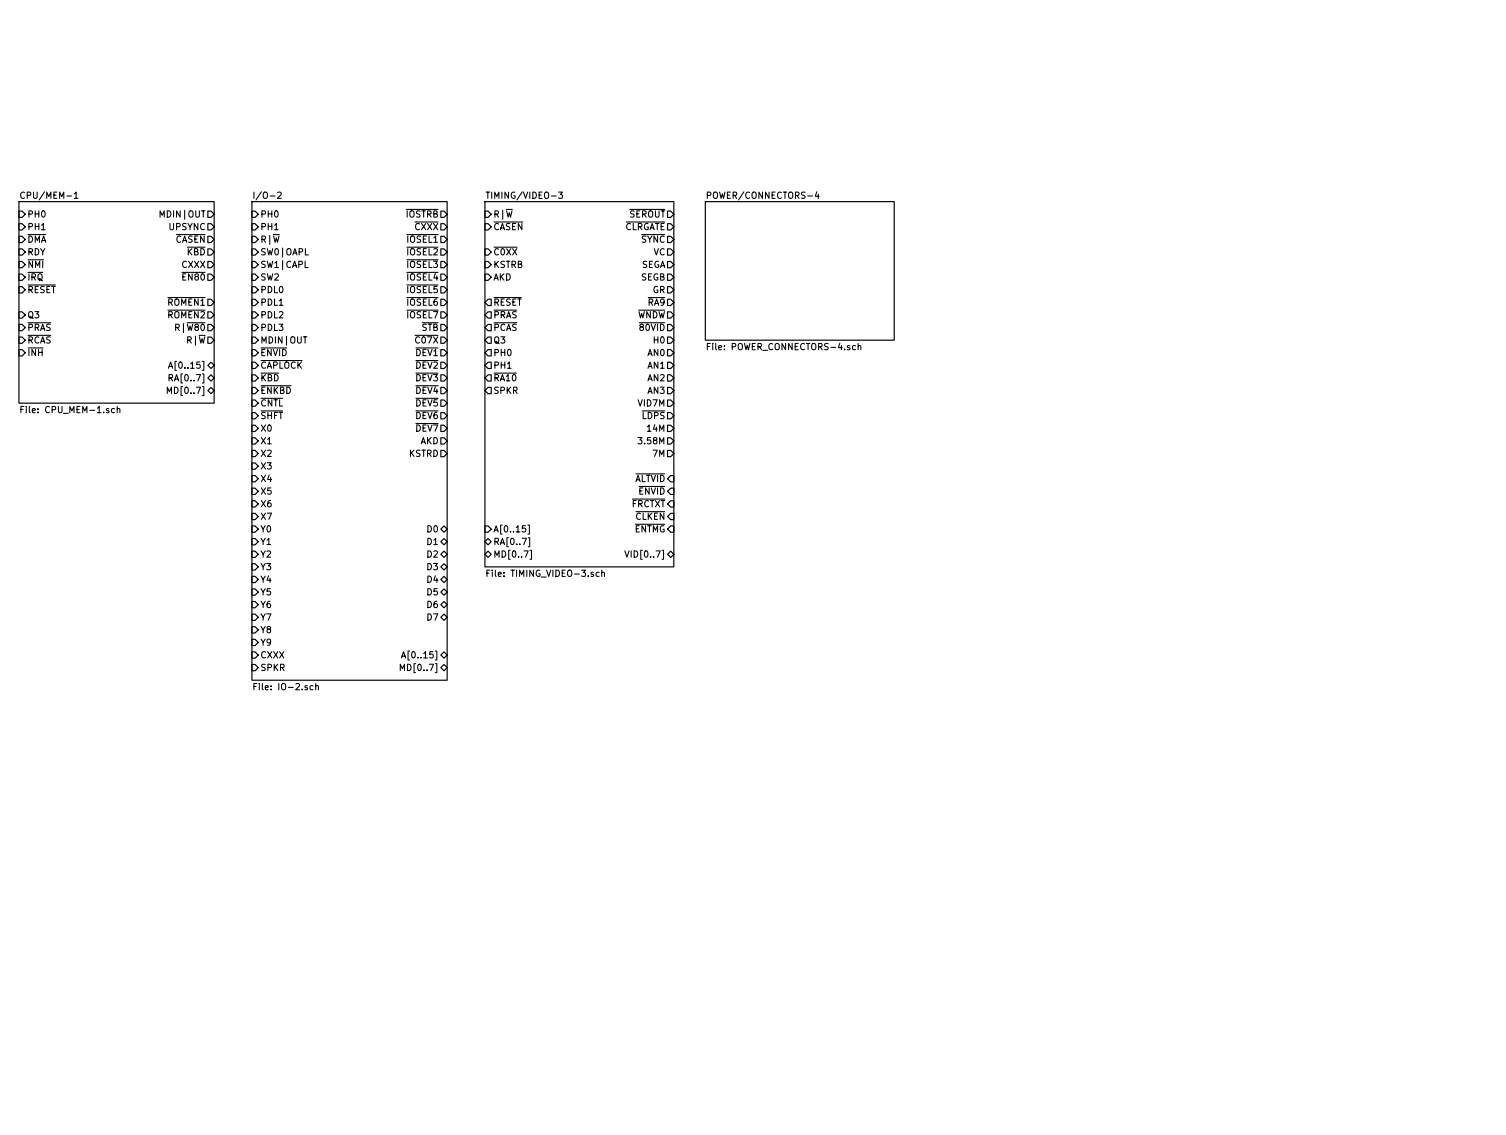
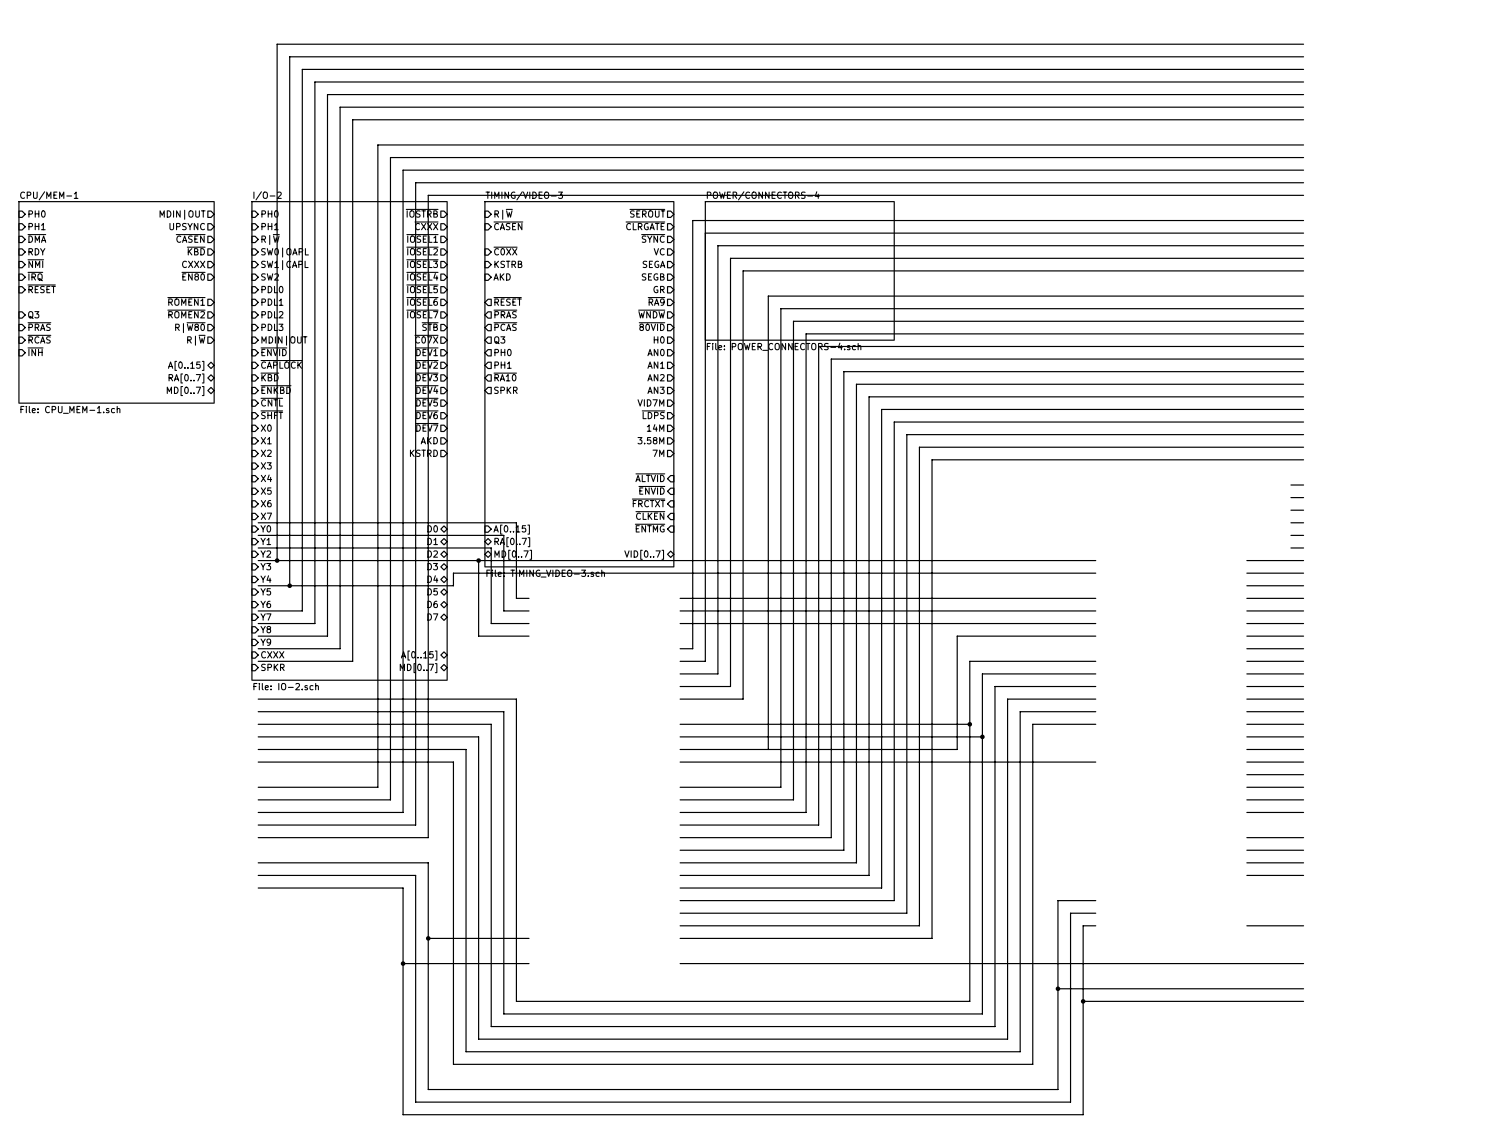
wire: none -> (1303, 44) (277, 44) (277, 560)
wire: none -> (1303, 56) (289, 56) (289, 585)
wire: none -> (1303, 69) (302, 69) (302, 610) (258, 610)
wire: none -> (1303, 81) (314, 81) (314, 623) (258, 623)
wire: none -> (1303, 94) (327, 94) (327, 636) (258, 636)
wire: none -> (1303, 107) (340, 107) (340, 648) (258, 648)
wire: none -> (1303, 119) (352, 119) (352, 661) (258, 661)
wire: none -> (1303, 144) (377, 144) (377, 787) (258, 787)
wire: none -> (1303, 157) (390, 157) (390, 799) (258, 799)
wire: none -> (1303, 170) (403, 170) (403, 812) (258, 812)
wire: none -> (1303, 182) (415, 182) (415, 825) (258, 825)
wire: none -> (1303, 195) (428, 195) (428, 837) (258, 837)
wire: none -> (1303, 220) (692, 220) (692, 648) (680, 648)
bus: none -> (1303, 233) (705, 233) (705, 661) (680, 661)
wire: none -> (1303, 245) (717, 245) (717, 673) (680, 673)
wire: none -> (1303, 258) (730, 258) (730, 686) (680, 686)
bus: none -> (1303, 270) (743, 270) (743, 699) (680, 699)
wire: none -> (1303, 296) (768, 296) (768, 749)
wire: none -> (1303, 308) (780, 308) (780, 787) (680, 787)
wire: none -> (1303, 321) (793, 321) (793, 799) (680, 799)
wire: none -> (1303, 333) (806, 333) (806, 812) (680, 812)
wire: none -> (1303, 346) (818, 346) (818, 825) (680, 825)
wire: none -> (1303, 359) (831, 359) (831, 837) (680, 837)
wire: none -> (1303, 371) (843, 371) (843, 850) (680, 850)
wire: none -> (1303, 384) (856, 384) (856, 862) (680, 862)
wire: none -> (1303, 396) (869, 396) (869, 875) (680, 875)
wire: none -> (1303, 409) (881, 409) (881, 888) (680, 888)
bus: none -> (1303, 422) (894, 422) (894, 900) (680, 900)
bus: none -> (1303, 434) (906, 434) (906, 913) (680, 913)
wire: none -> (1303, 447) (919, 447) (919, 925) (680, 925)
wire: none -> (1303, 459) (932, 459) (932, 938) (680, 938)
wire: none -> (1290, 485) (1303, 485)
wire: none -> (1290, 497) (1303, 497)
wire: none -> (1290, 510) (1303, 510)
wire: none -> (258, 522) (516, 522) (516, 598) (529, 598)
wire: none -> (1290, 522) (1303, 522)
wire: none -> (258, 535) (503, 535) (503, 610) (529, 610)
wire: none -> (1290, 535) (1303, 535)
wire: none -> (258, 547) (491, 547) (491, 623) (529, 623)
wire: none -> (1290, 547) (1303, 547)
wire: none -> (258, 560) (1095, 560)
junction: none -> (277, 560)
wire: none -> (478, 560) (478, 636) (529, 636)
junction: none -> (478, 560)
wire: none -> (1246, 560) (1303, 560)
wire: none -> (1095, 573) (453, 573) (453, 585) (258, 585)
wire: none -> (1246, 573) (1303, 573)
junction: none -> (289, 585)
wire: none -> (1246, 585) (1303, 585)
wire: none -> (680, 598) (1095, 598)
wire: none -> (1246, 598) (1303, 598)
wire: none -> (680, 610) (1095, 610)
wire: none -> (1246, 610) (1303, 610)
wire: none -> (680, 623) (1095, 623)
wire: none -> (1246, 623) (1303, 623)
wire: none -> (1095, 636) (957, 636) (957, 749) (680, 749)
wire: none -> (1246, 636) (1303, 636)
wire: none -> (1246, 648) (1303, 648)
wire: none -> (1095, 661) (969, 661) (969, 1001) (516, 1001) (516, 699) (258, 699)
wire: none -> (1246, 661) (1303, 661)
wire: none -> (1095, 673) (982, 673) (982, 1013) (503, 1013) (503, 711) (258, 711)
wire: none -> (1246, 673) (1303, 673)
wire: none -> (1095, 686) (994, 686) (994, 1026) (491, 1026) (491, 724) (258, 724)
wire: none -> (1246, 686) (1303, 686)
wire: none -> (1095, 699) (1007, 699) (1007, 1039) (478, 1039) (478, 736) (258, 736)
wire: none -> (1246, 699) (1303, 699)
wire: none -> (1095, 711) (1020, 711) (1020, 1051) (466, 1051) (466, 749) (258, 749)
wire: none -> (1246, 711) (1303, 711)
wire: none -> (680, 724) (969, 724)
junction: none -> (969, 724)
wire: none -> (1095, 724) (1032, 724) (1032, 1064) (453, 1064) (453, 762) (258, 762)
wire: none -> (1246, 724) (1303, 724)
wire: none -> (680, 736) (982, 736)
junction: none -> (982, 736)
wire: none -> (1246, 736) (1303, 736)
wire: none -> (1246, 749) (1303, 749)
wire: none -> (680, 762) (1095, 762)
wire: none -> (1246, 762) (1303, 762)
wire: none -> (1246, 774) (1303, 774)
wire: none -> (1246, 787) (1303, 787)
wire: none -> (1246, 799) (1303, 799)
wire: none -> (1246, 812) (1303, 812)
wire: none -> (1246, 837) (1303, 837)
wire: none -> (1246, 850) (1303, 850)
bus: none -> (258, 862) (428, 862) (428, 1089) (1057, 1089) (1057, 900) (1095, 900)
wire: none -> (1246, 862) (1303, 862)
bus: none -> (258, 875) (415, 875) (415, 1102) (1070, 1102) (1070, 913) (1095, 913)
wire: none -> (1246, 875) (1303, 875)
bus: none -> (258, 888) (403, 888) (403, 1114) (1083, 1114) (1083, 925) (1095, 925)
bus: none -> (1246, 925) (1303, 925)
bus: none -> (428, 938) (529, 938)
junction: none -> (428, 938)
bus: none -> (403, 963) (529, 963)
junction: none -> (403, 963)
bus: none -> (680, 963) (1303, 963)
bus: none -> (1057, 988) (1303, 988)
junction: none -> (1057, 988)
bus: none -> (1083, 1001) (1303, 1001)
junction: none -> (1083, 1001)

